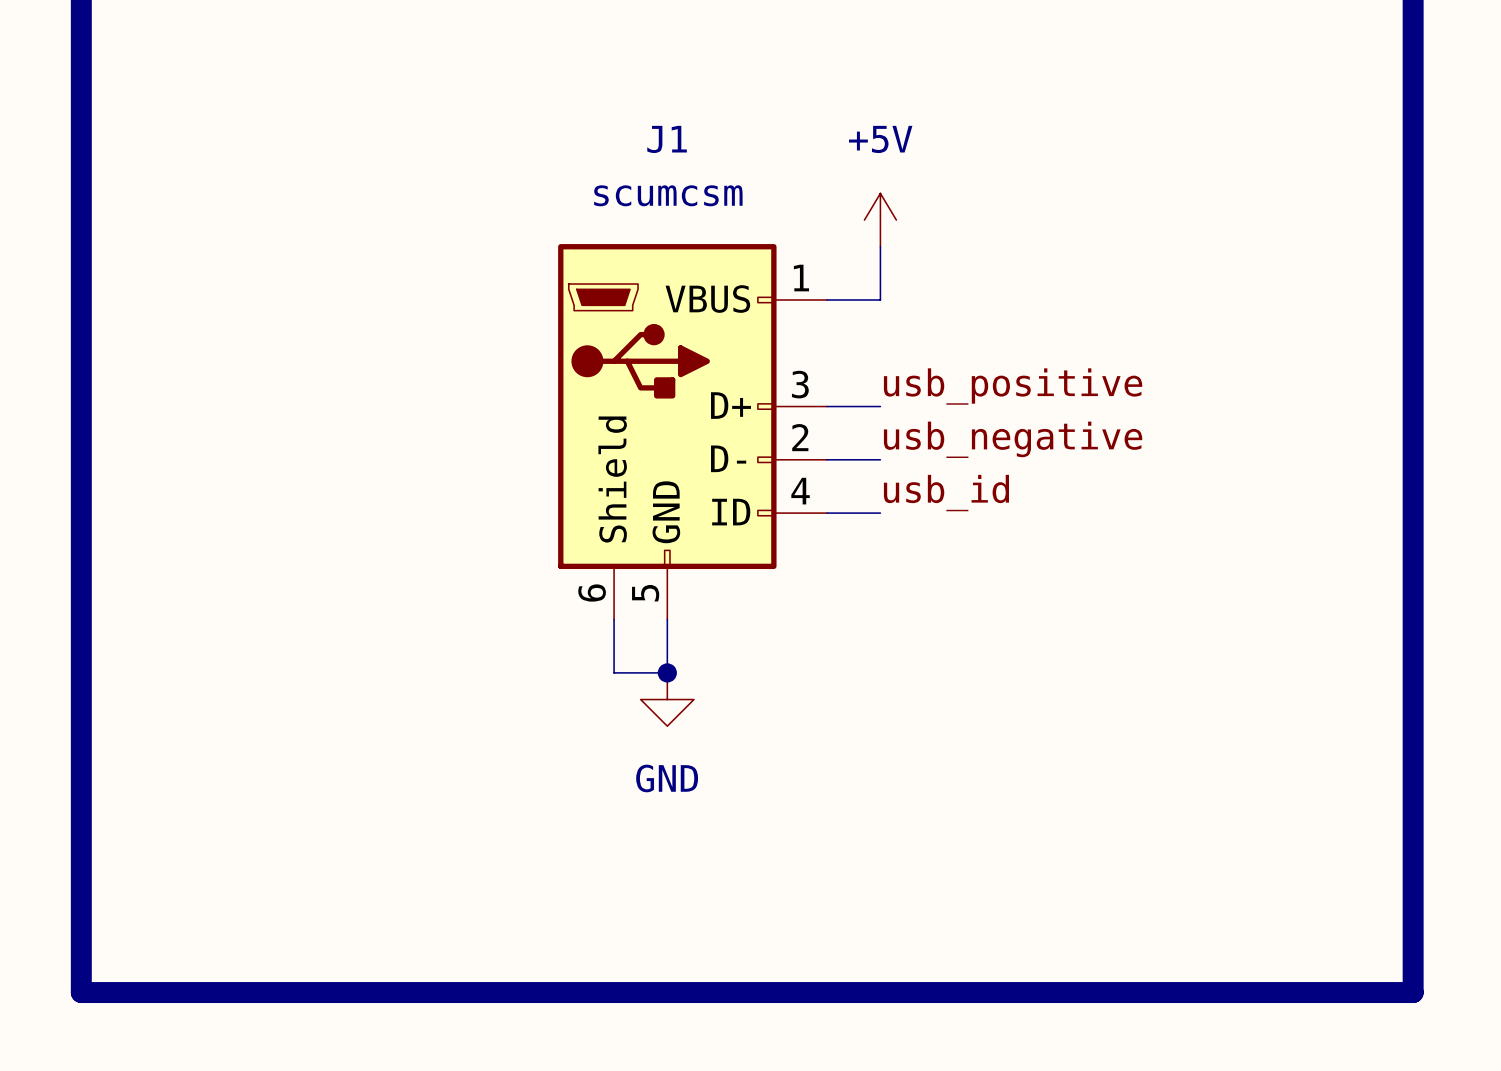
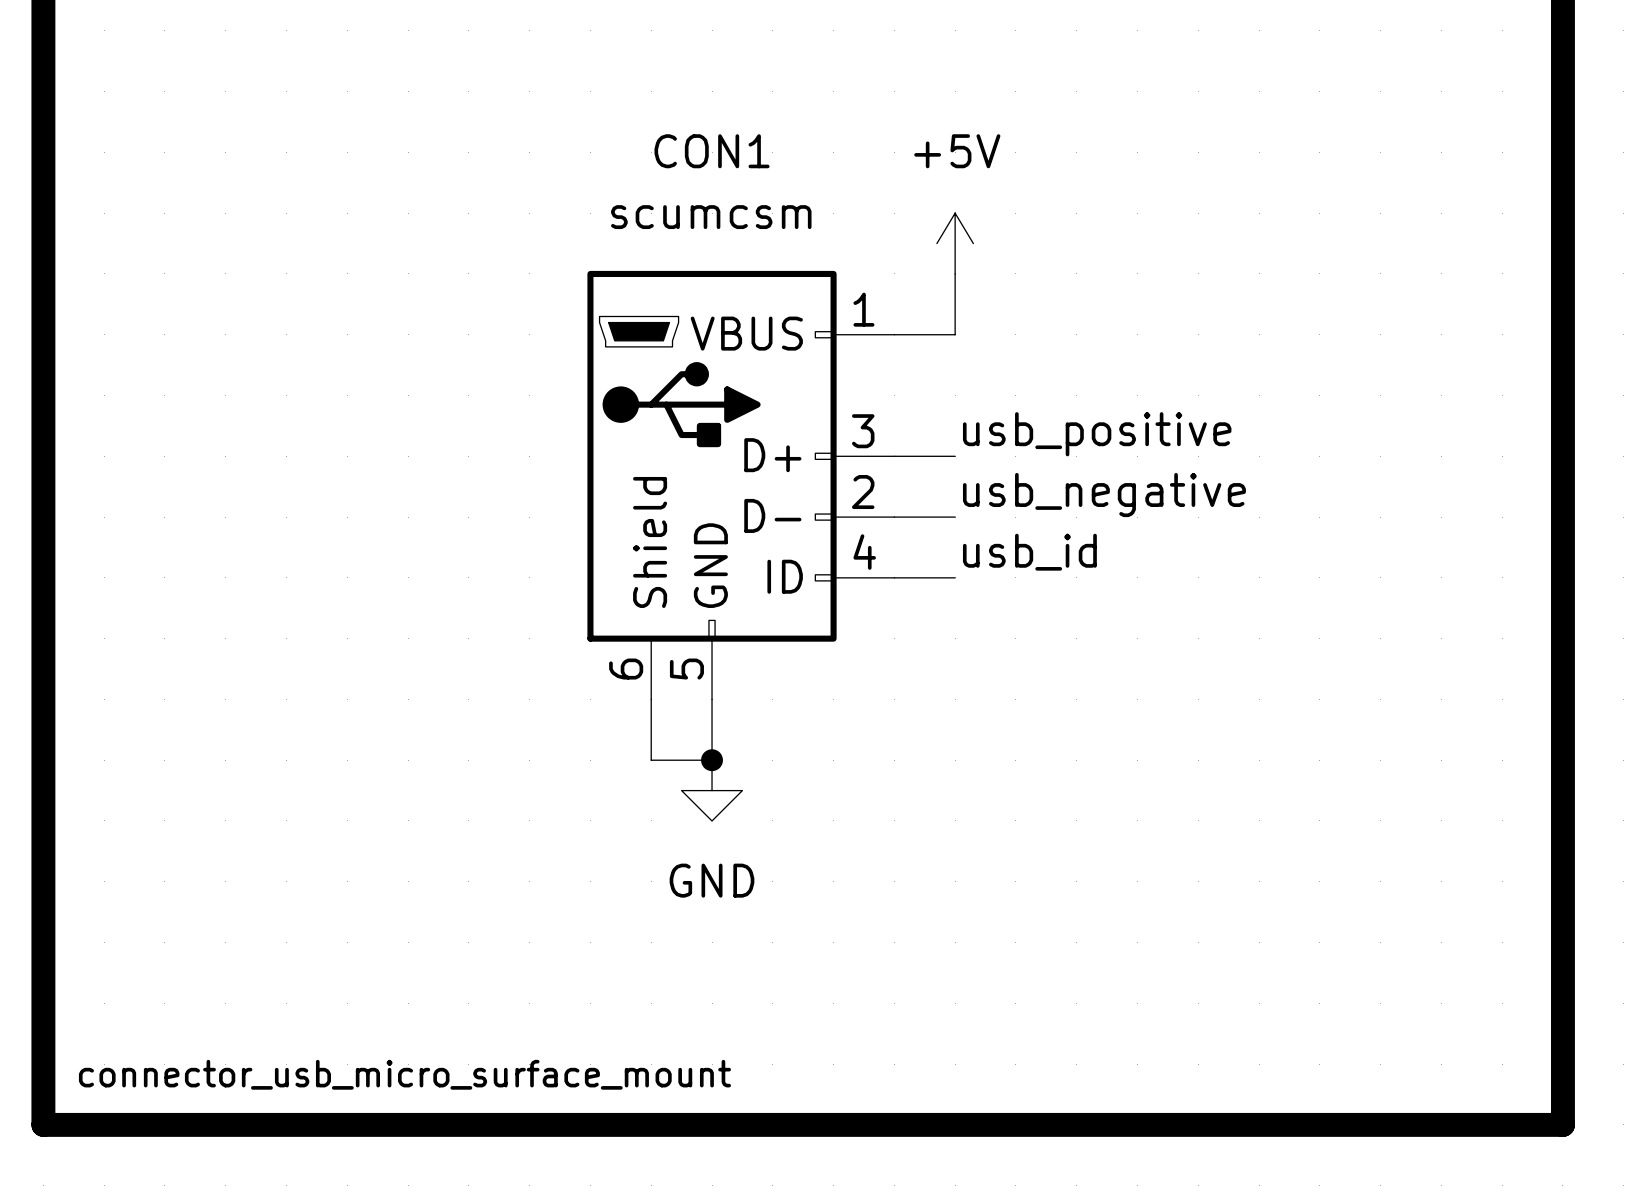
J1 name: J1 (667, 139) -> CON1 (712, 151)
text: none -> connector_usb_micro_surface_mount (404, 1074)

